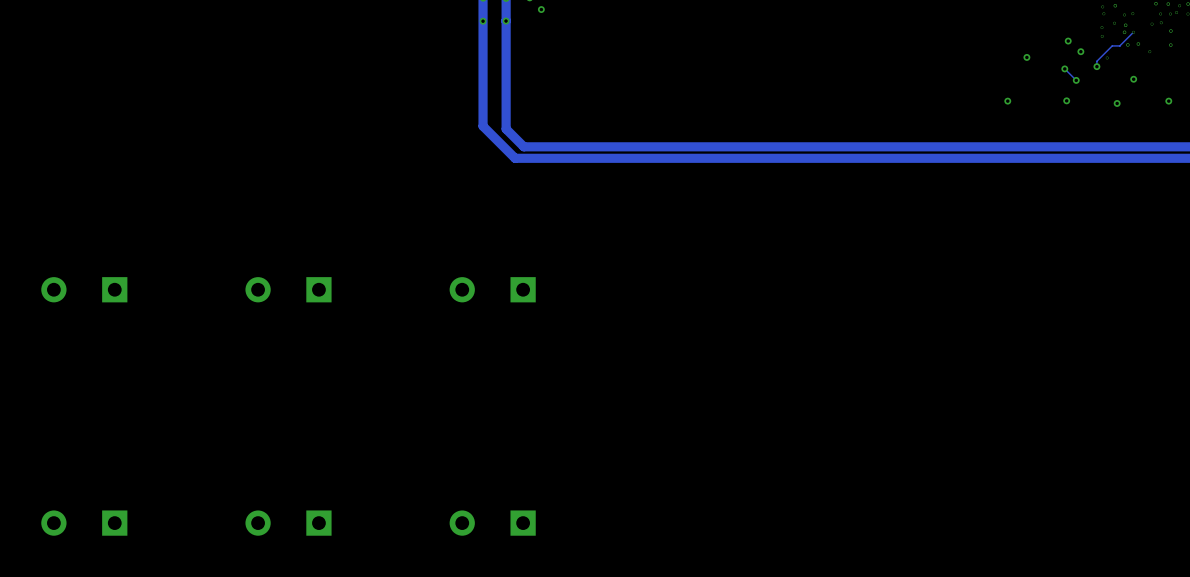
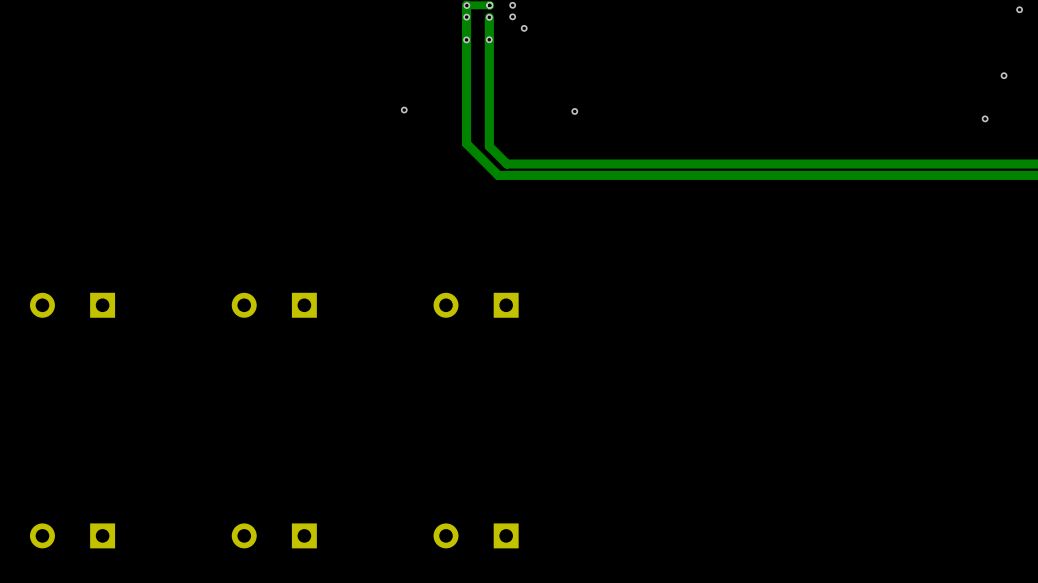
via: none -> (404, 110)
via: none -> (574, 111)

